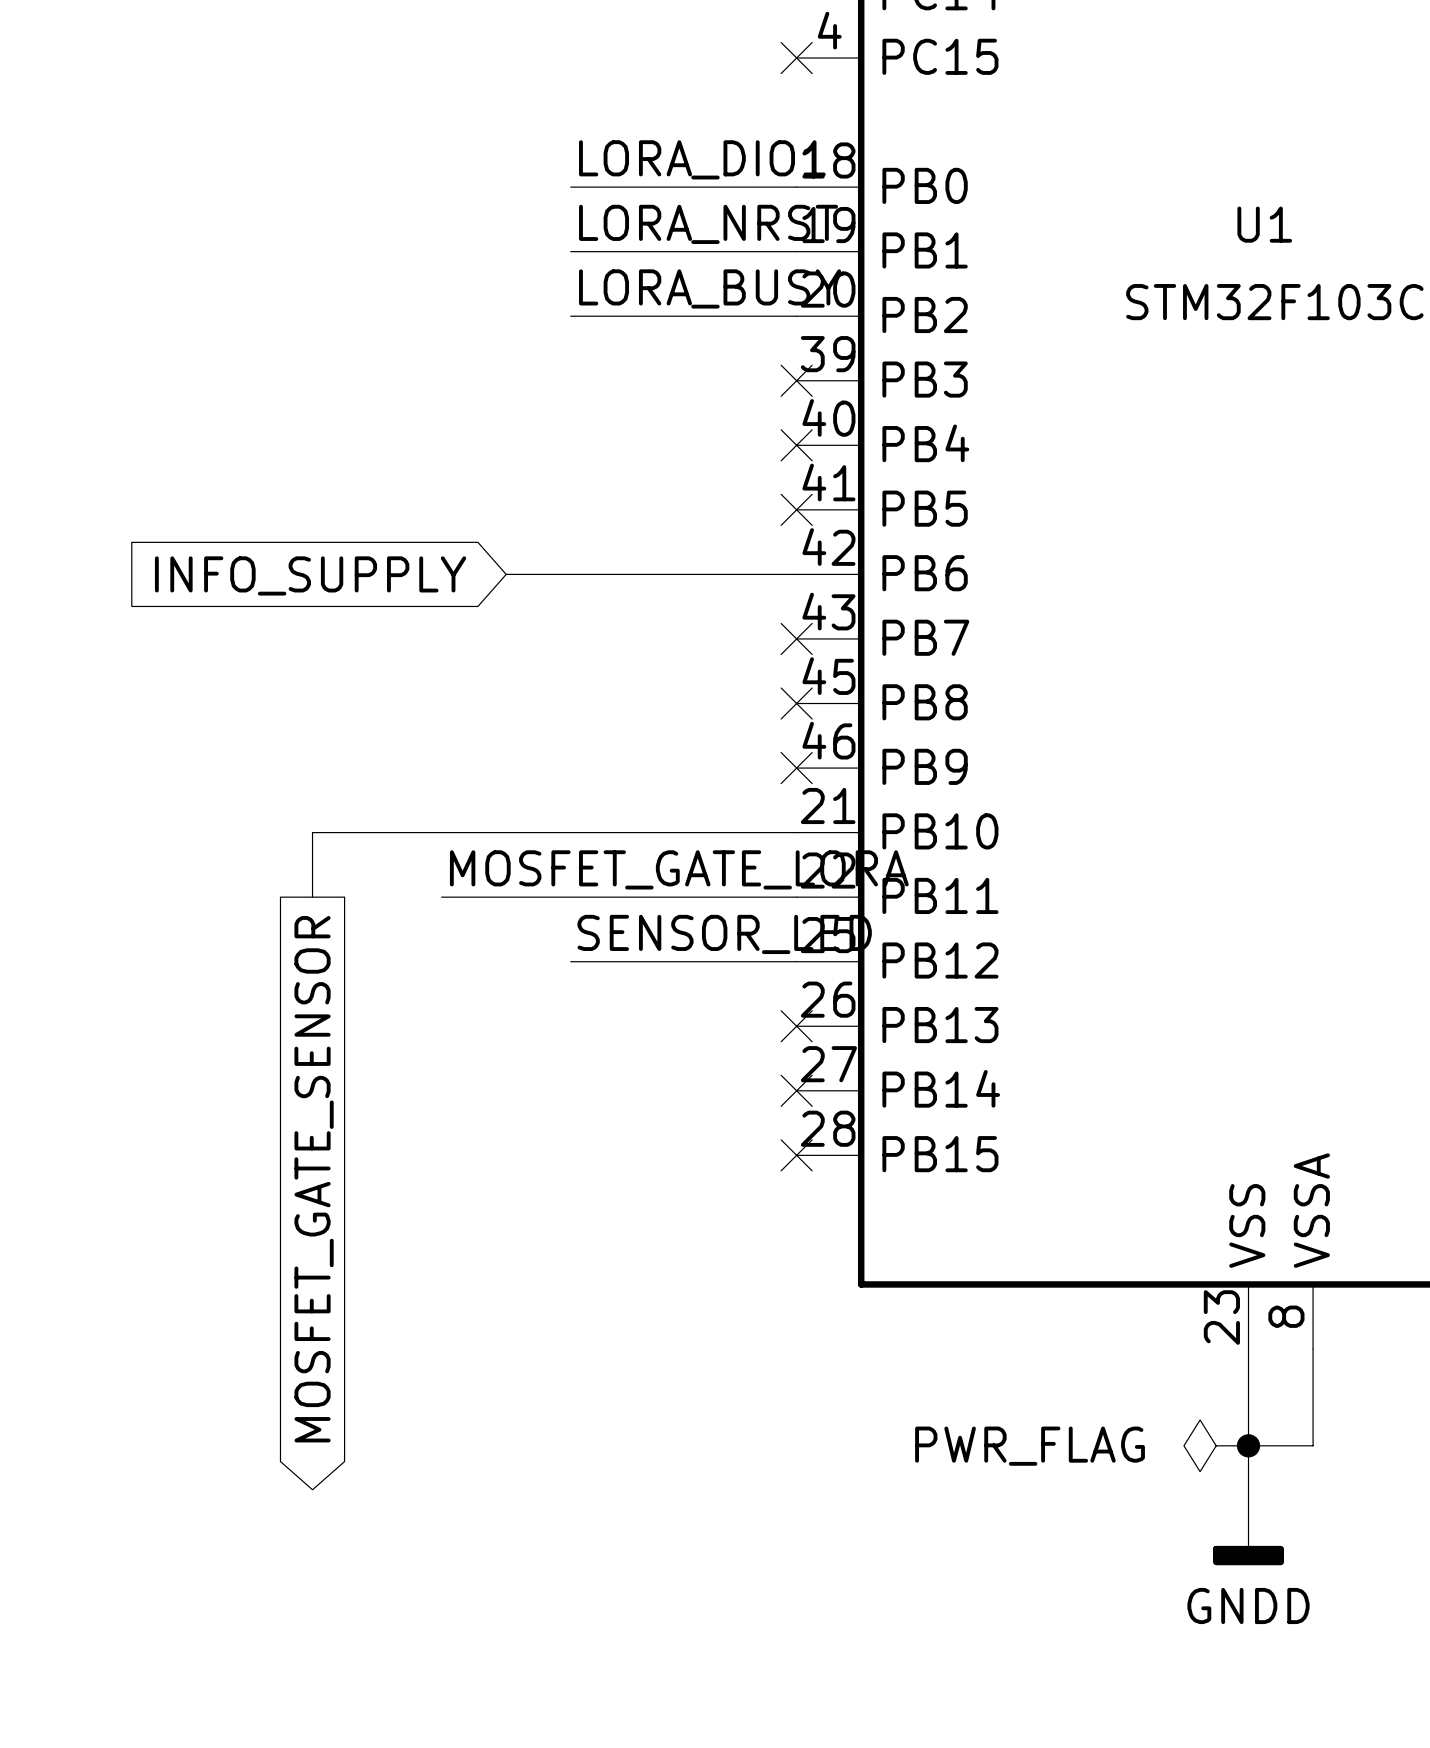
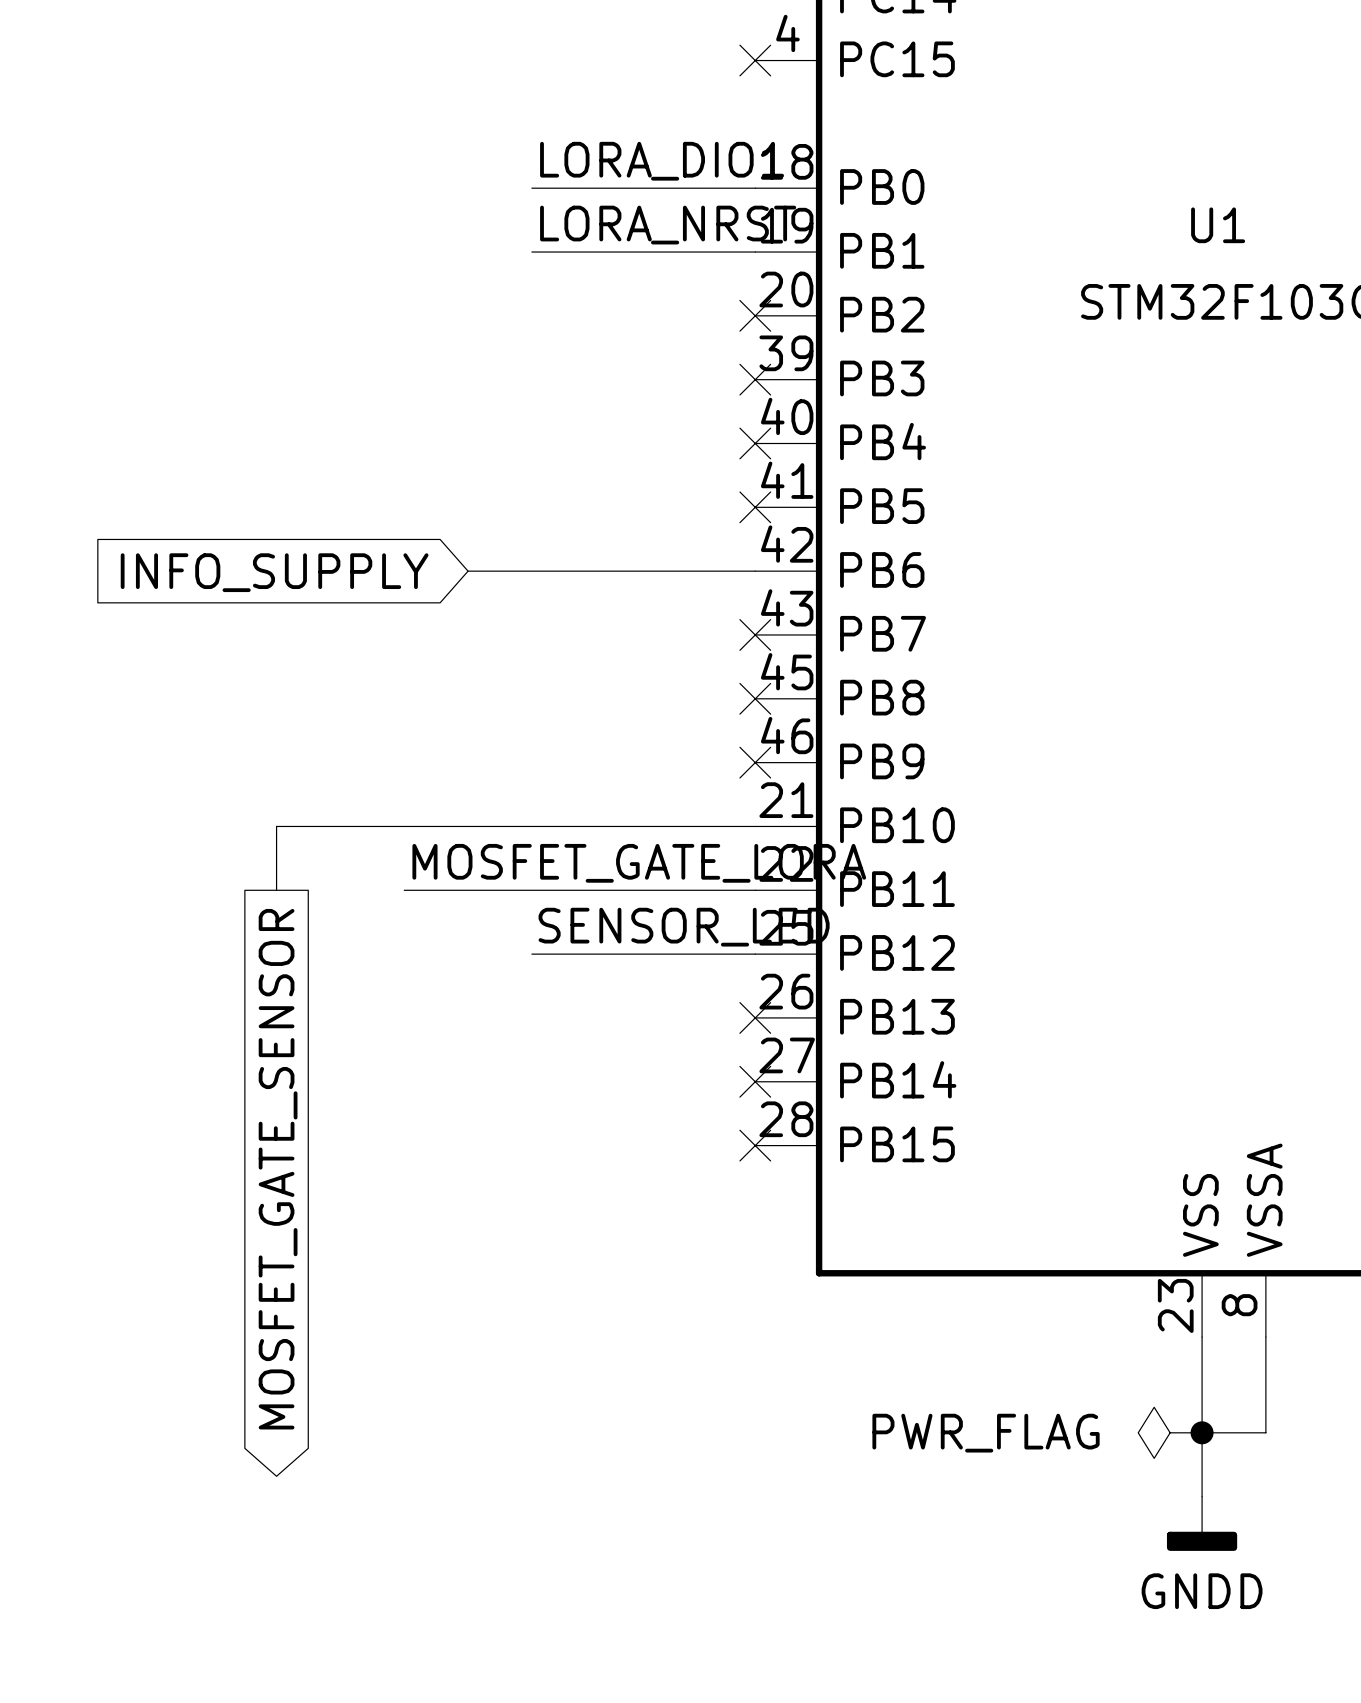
label: LORA_BUSY (710, 288) -> none
wire: (570, 316) (796, 316) -> none
no-connect mark: none -> (755, 315)

